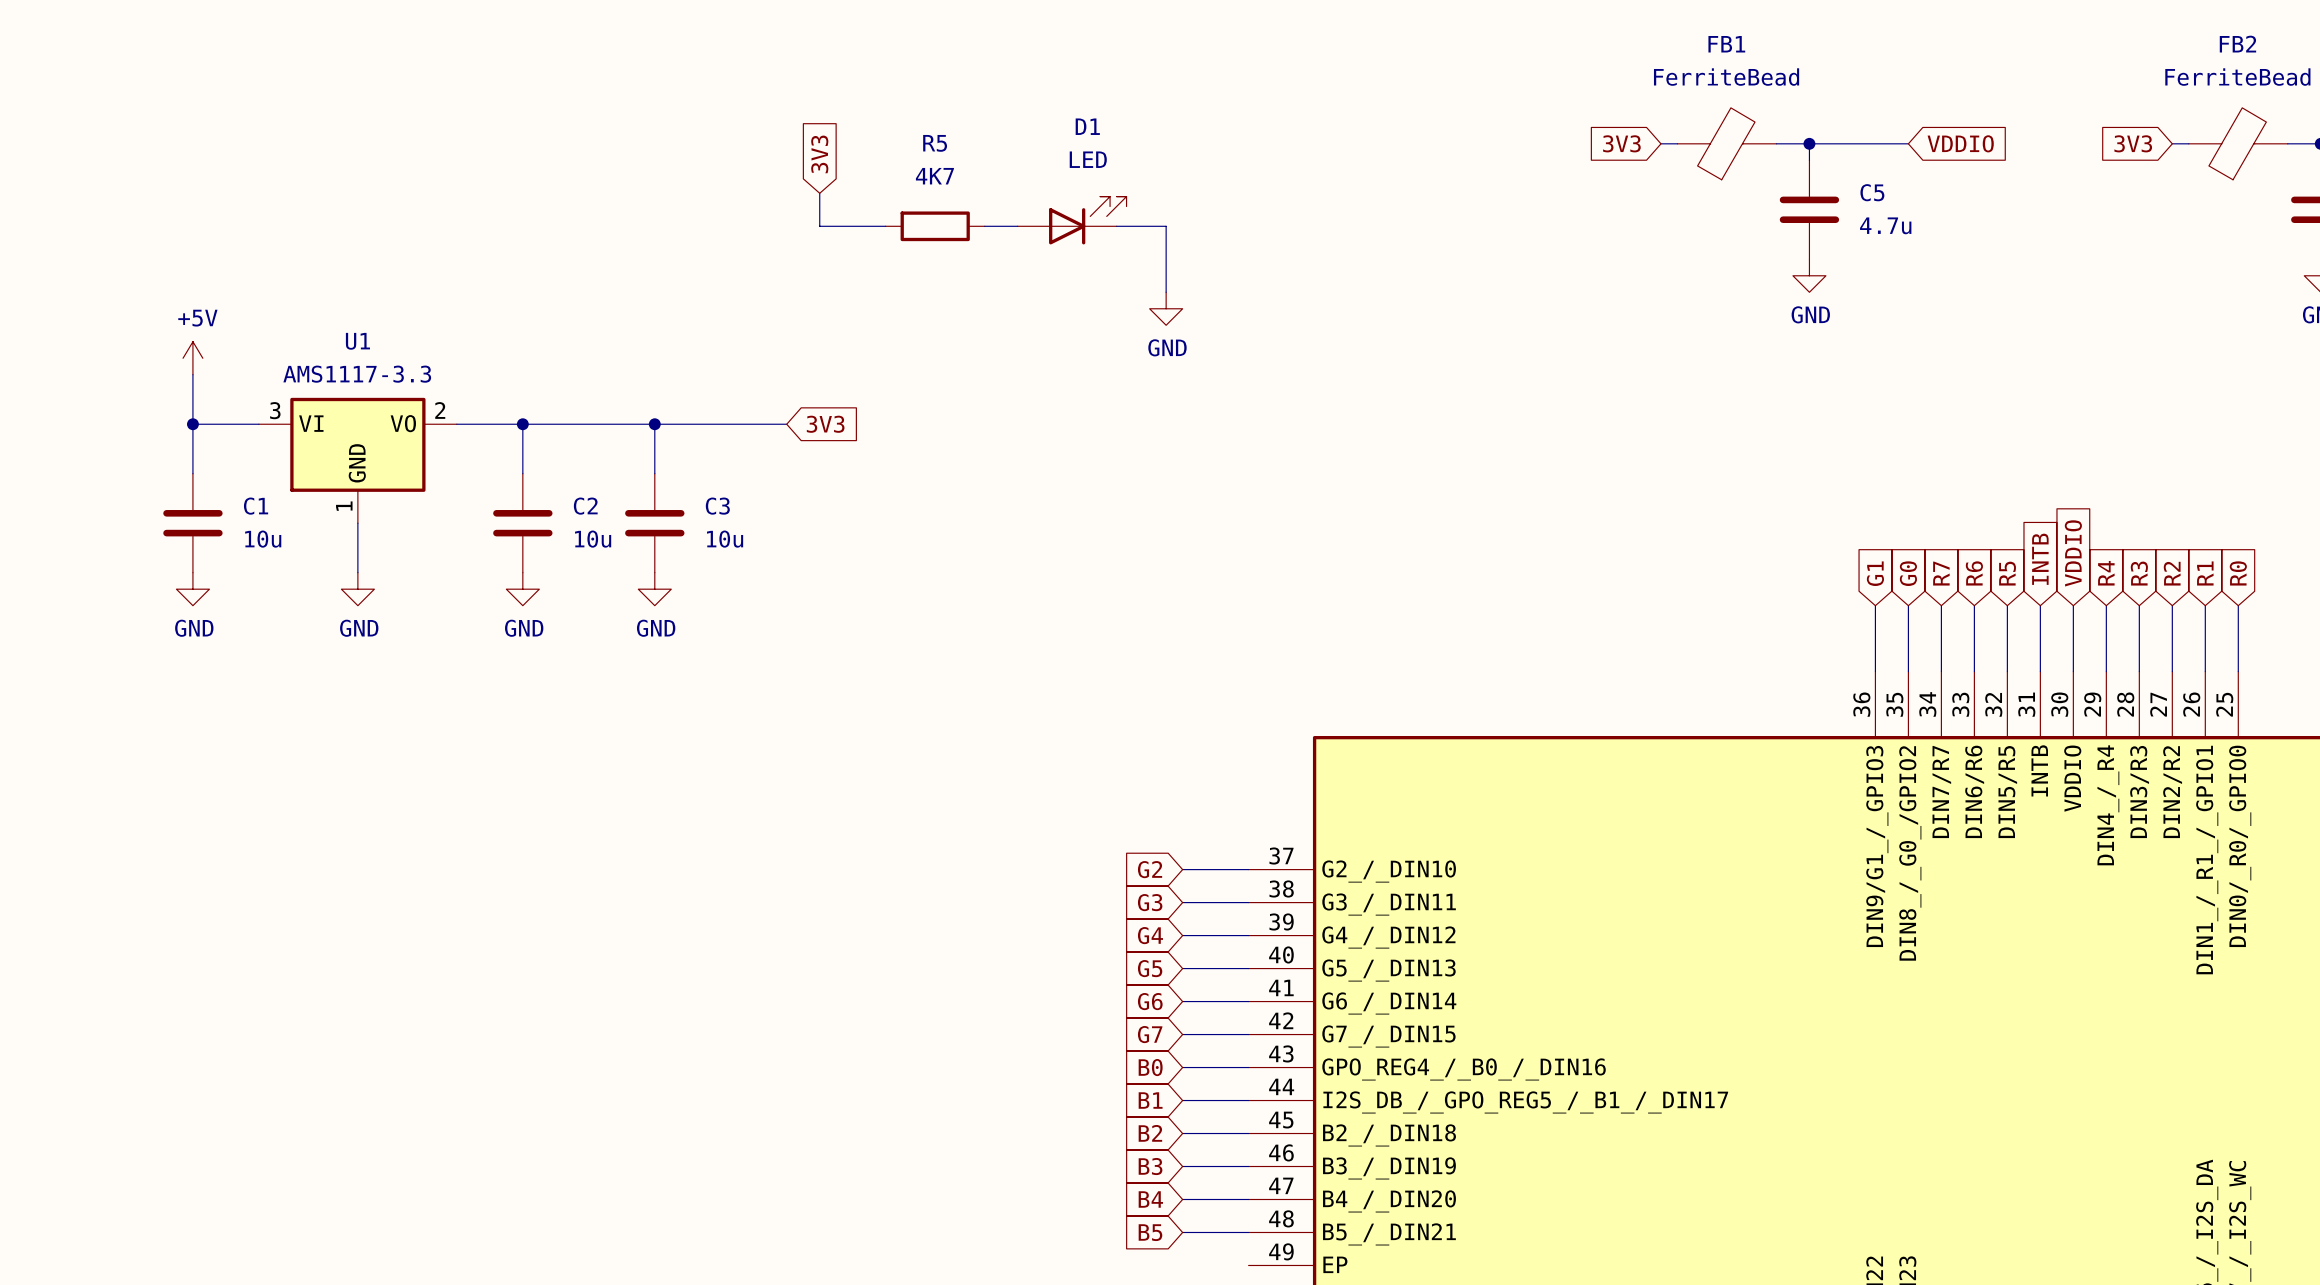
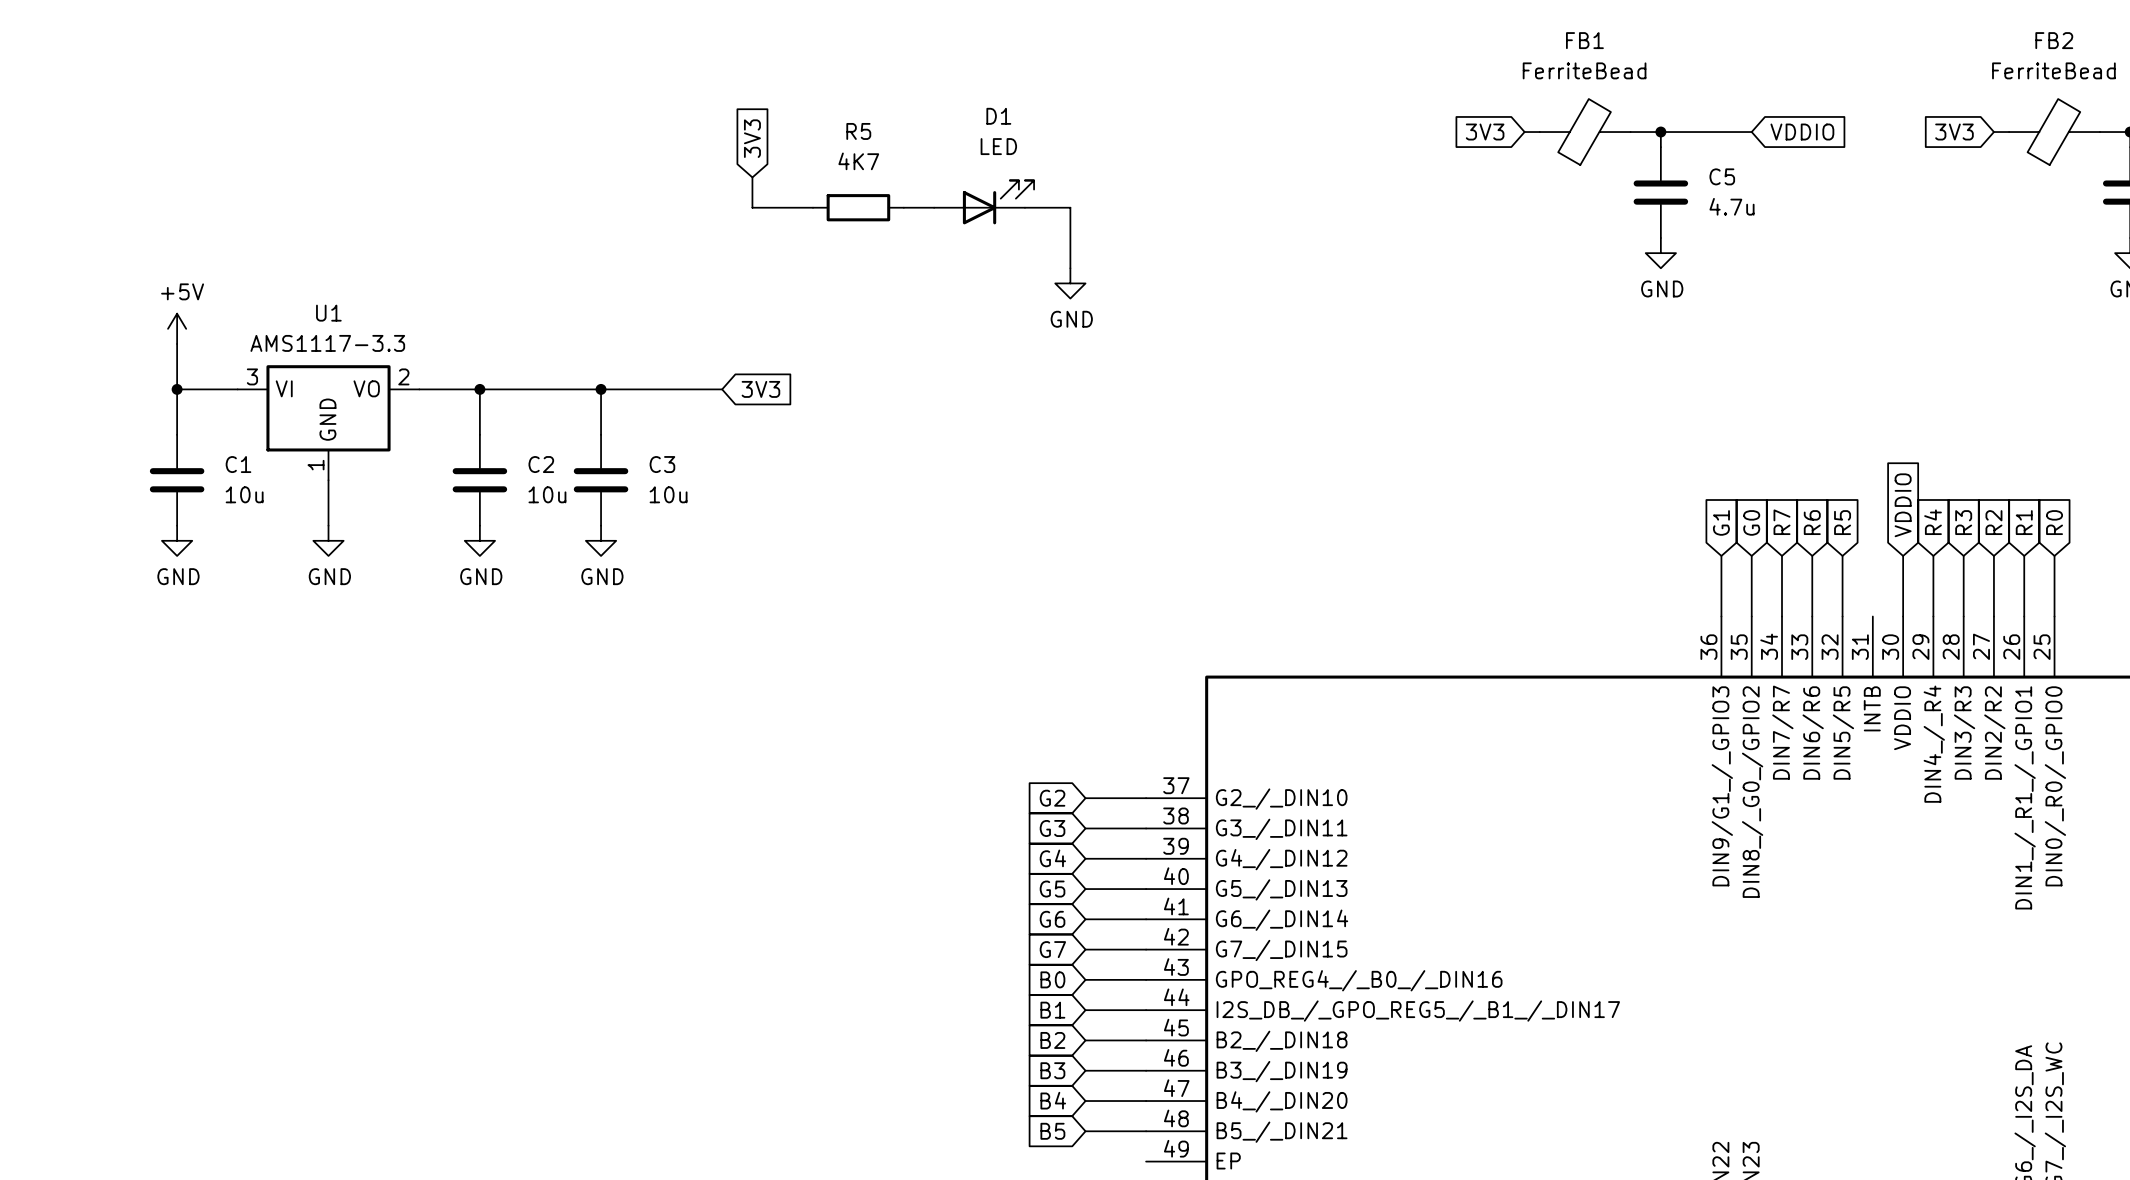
global label: INTB (2040, 559) -> none
wire: (2040, 605) (2040, 671) -> none

